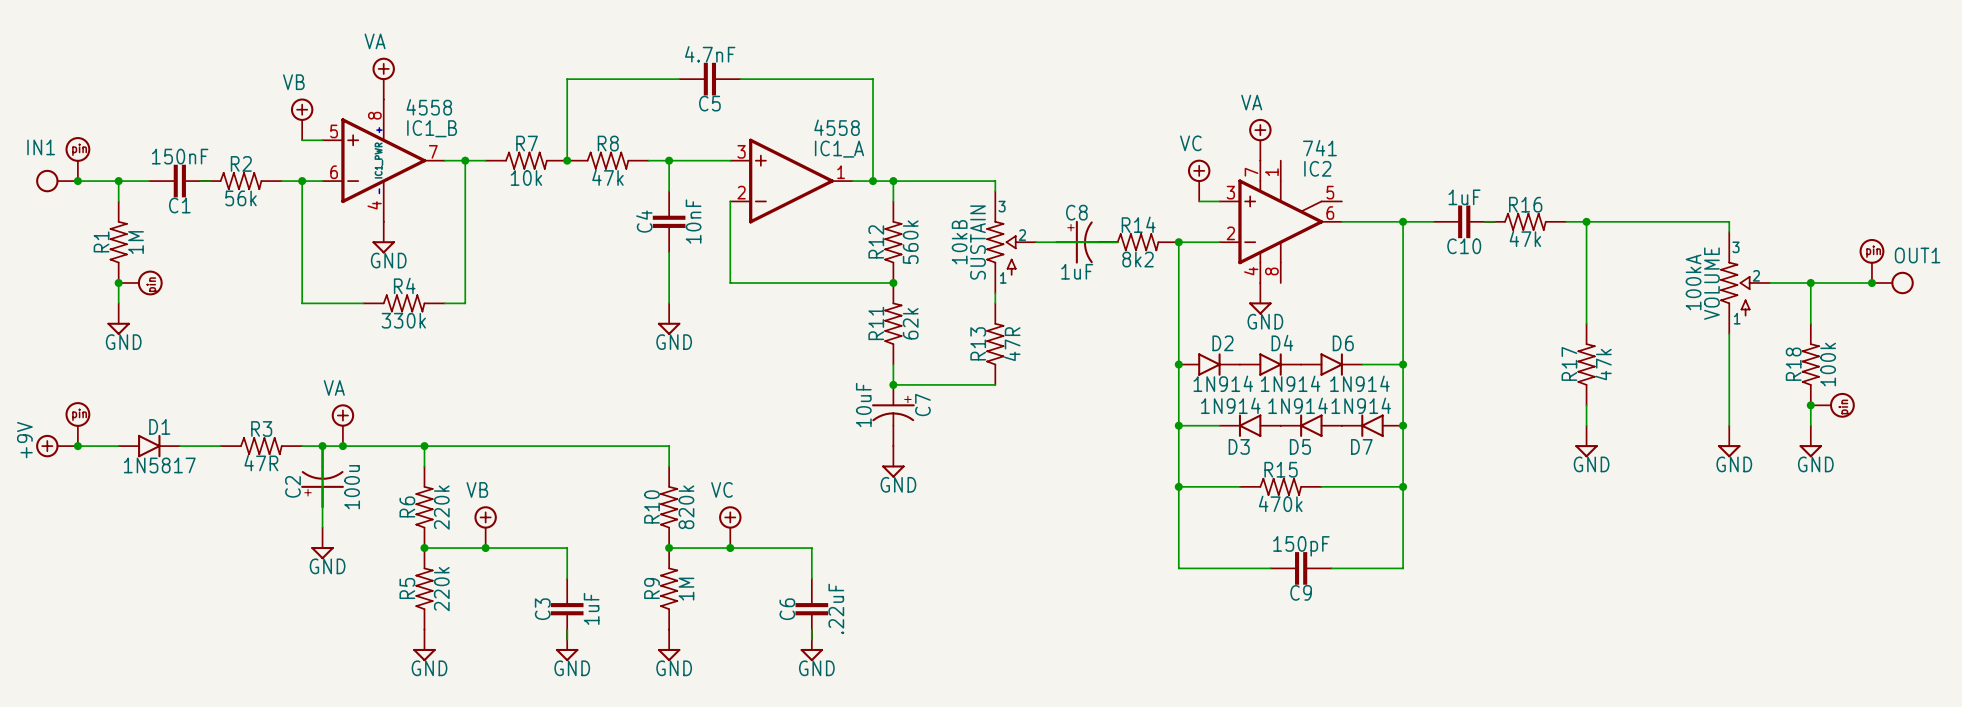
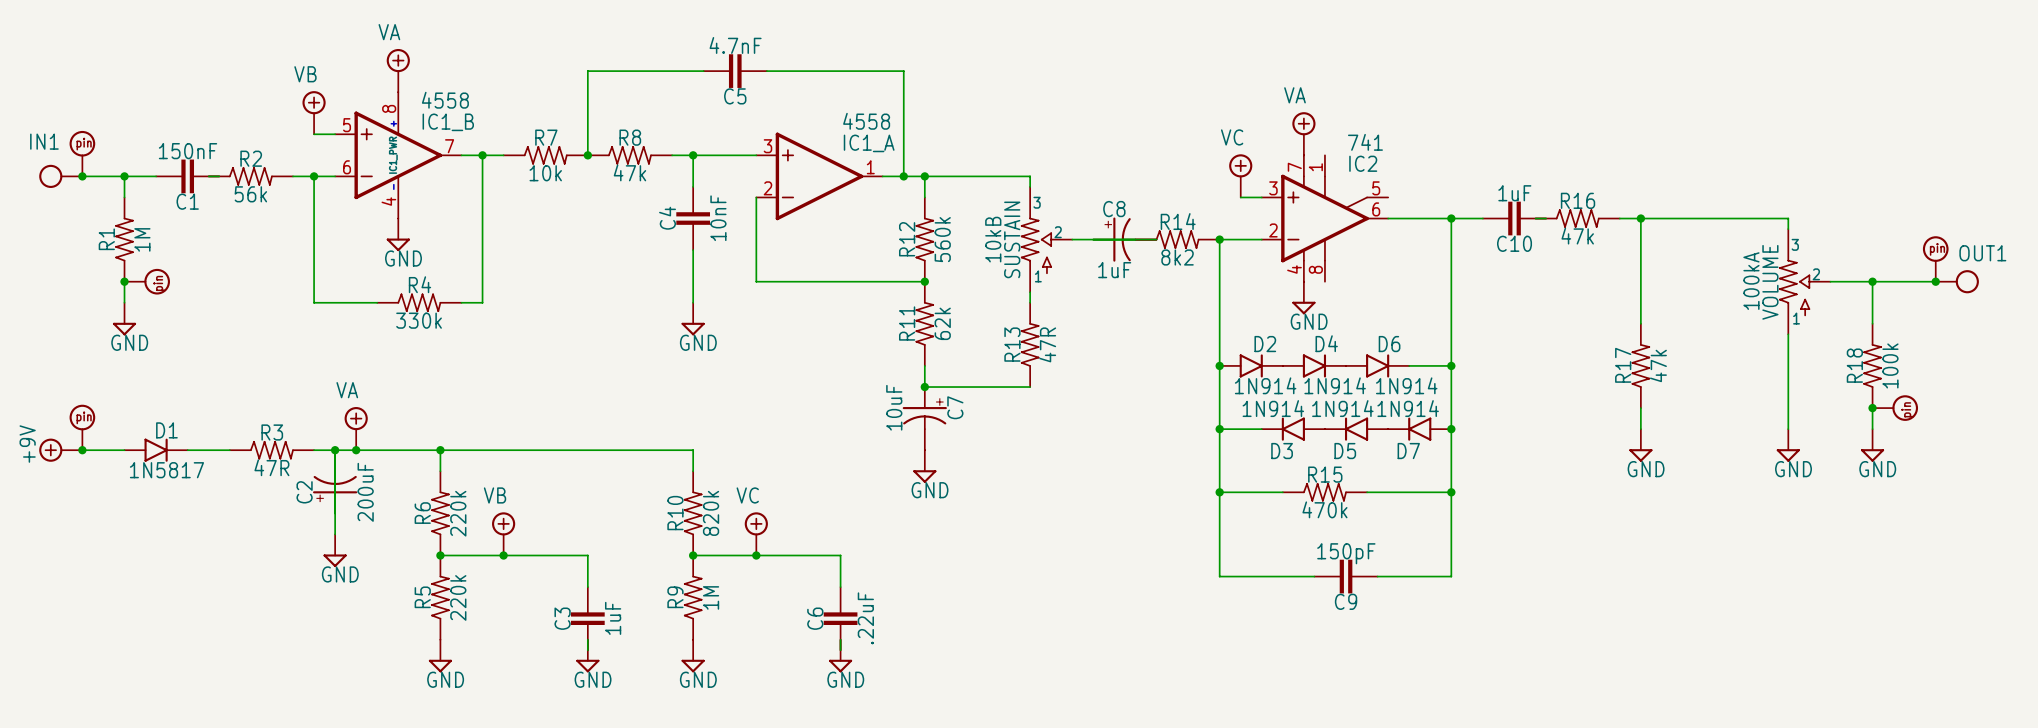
C2 value: 100u (352, 487) -> 200uF (365, 492)

